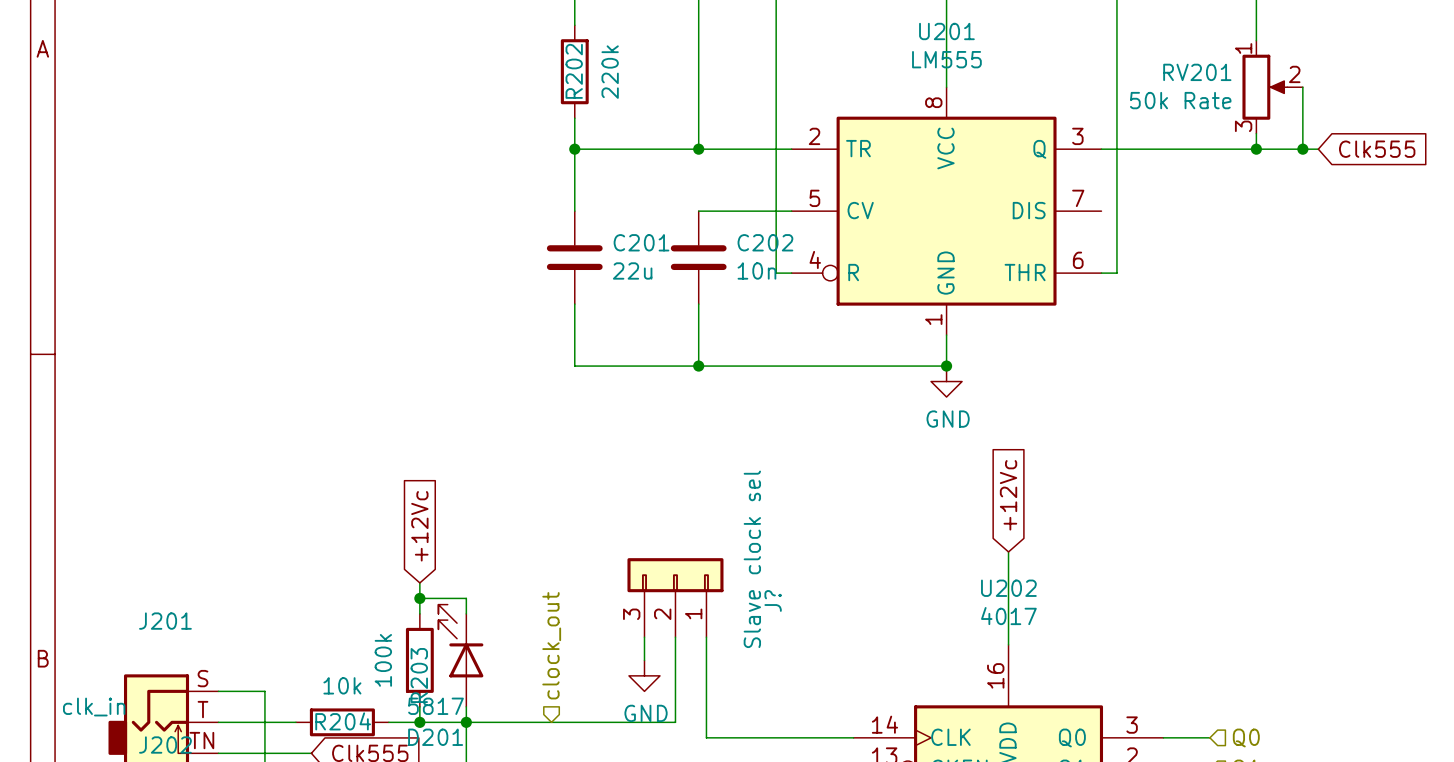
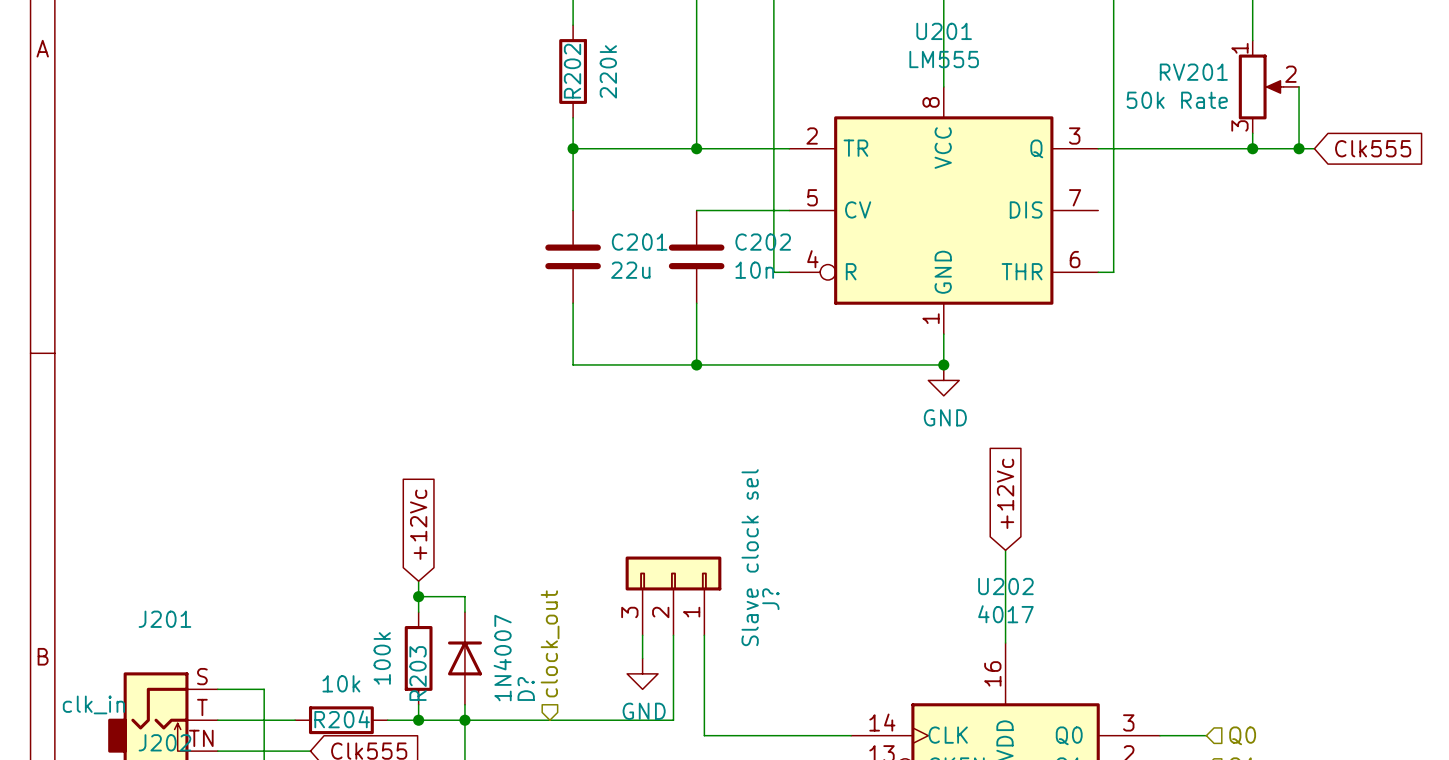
D201: 5817 (460, 655) -> none
D?: none -> 1N4007 (464, 658)

